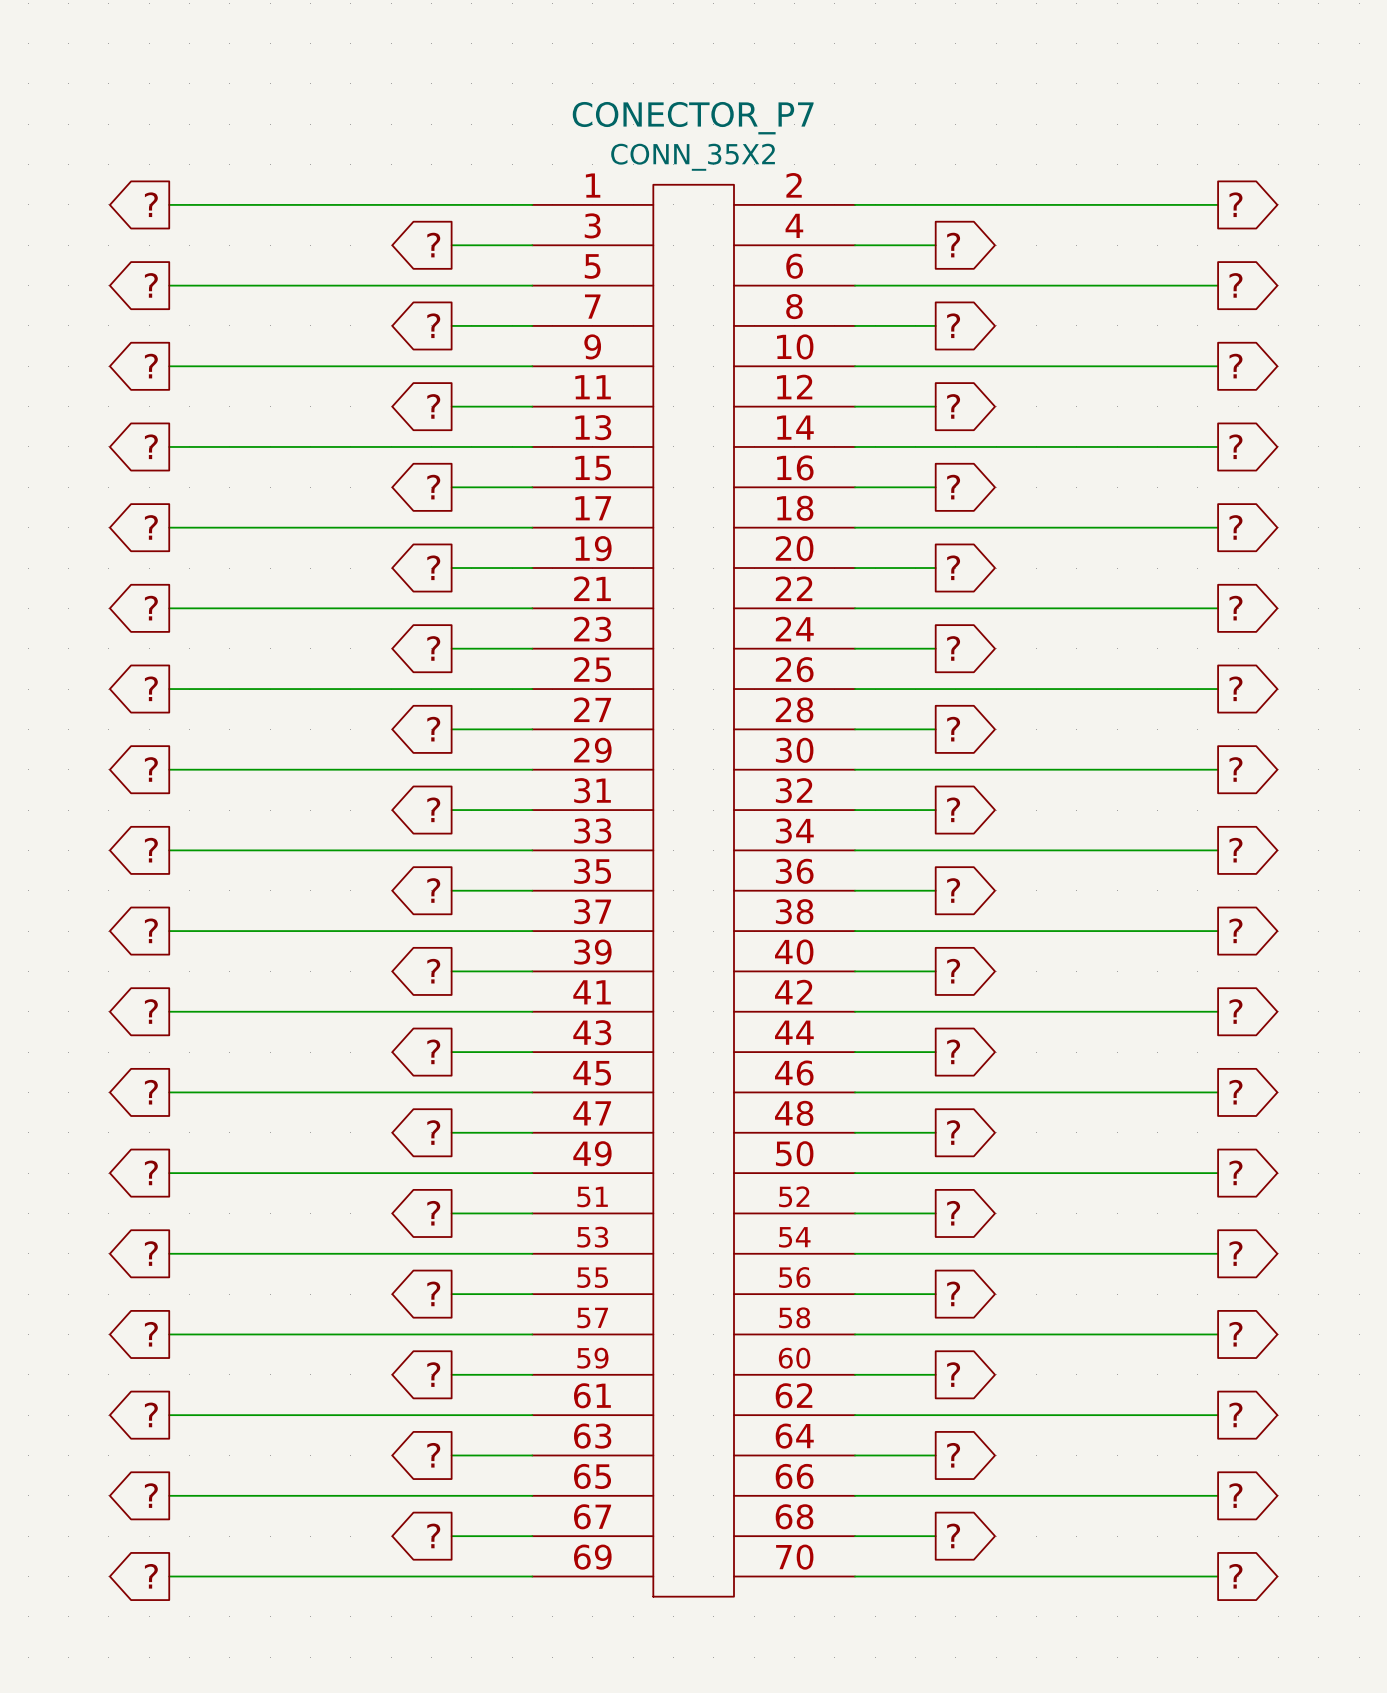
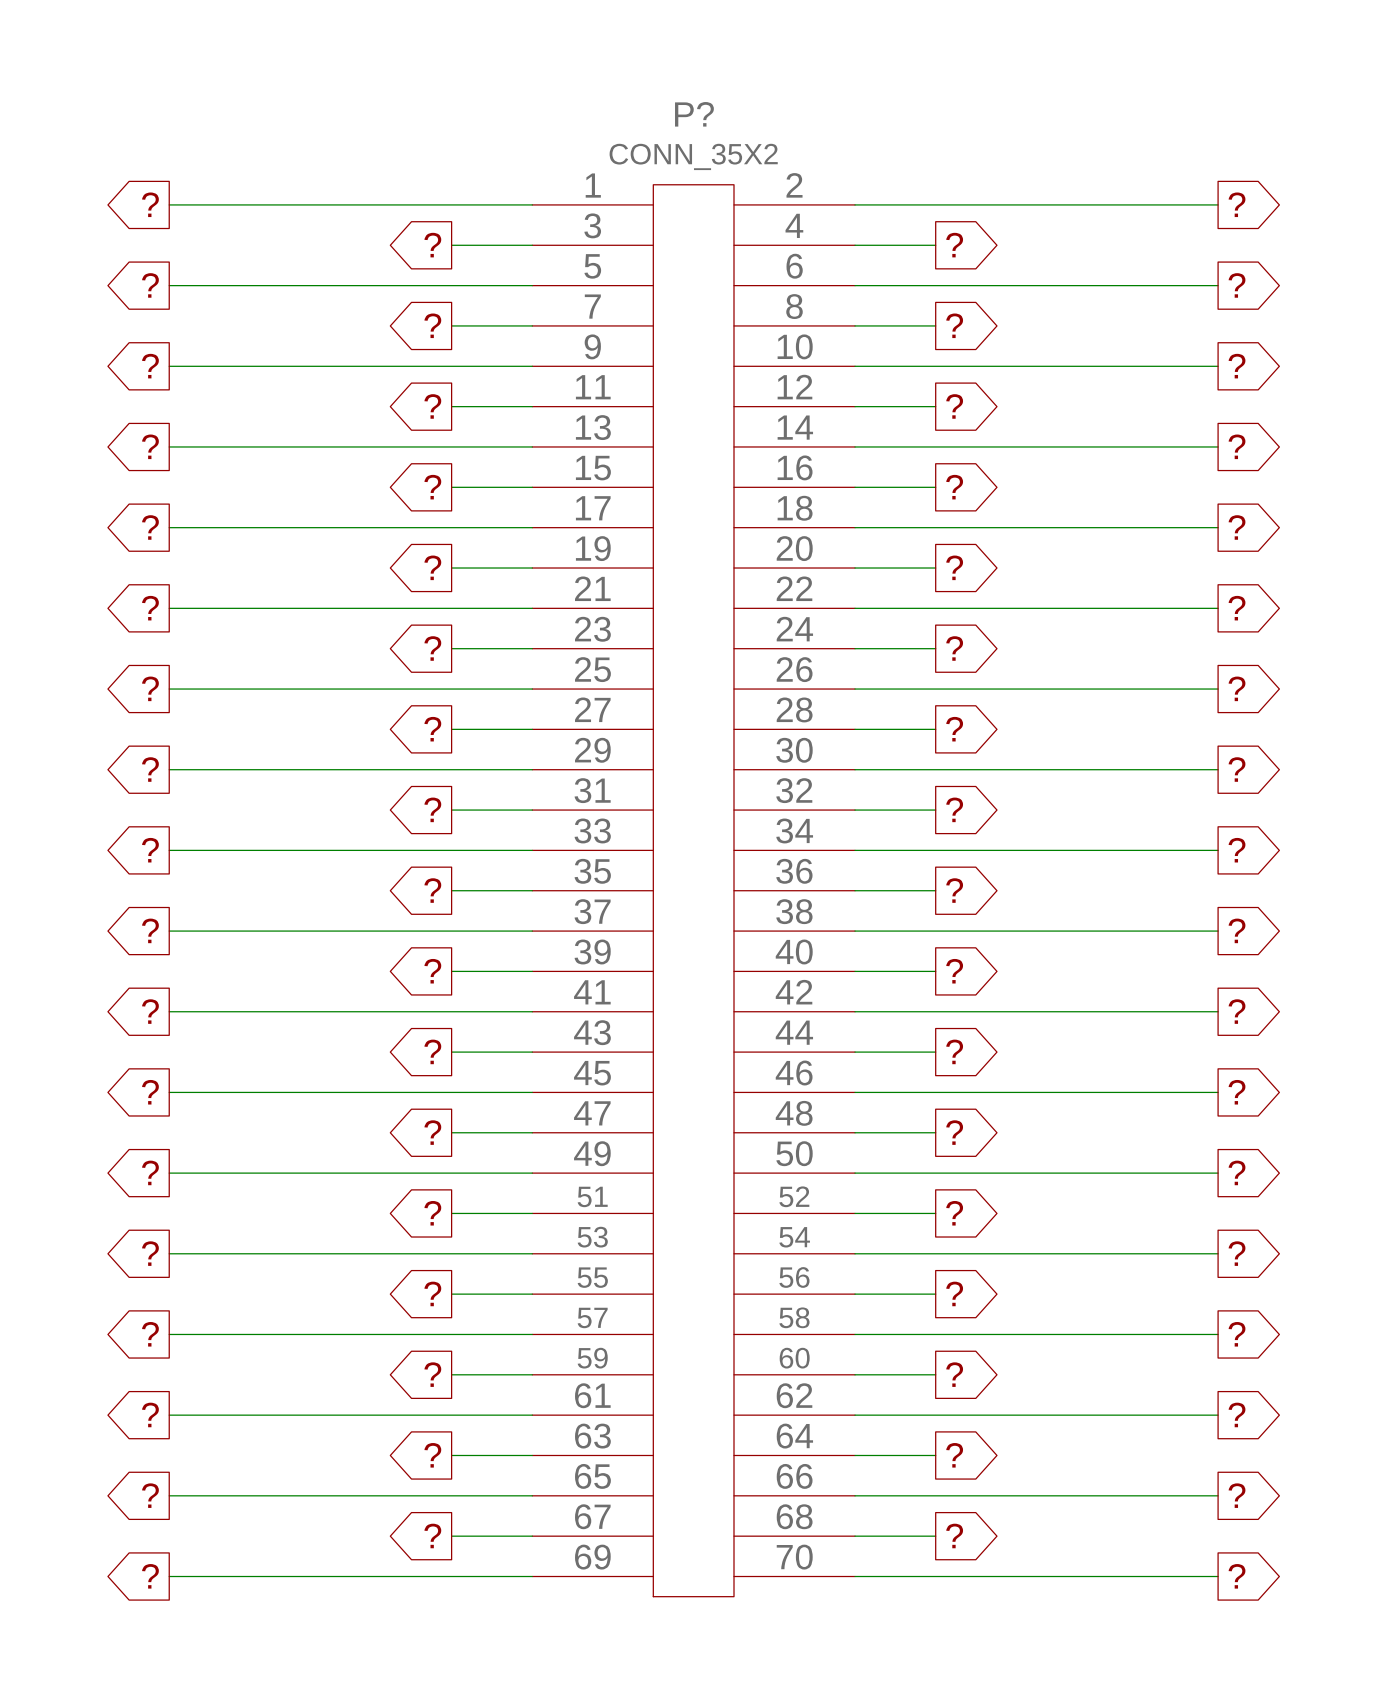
CONECTOR_P7 name: CONECTOR_P7 (693, 118) -> P? (694, 114)

